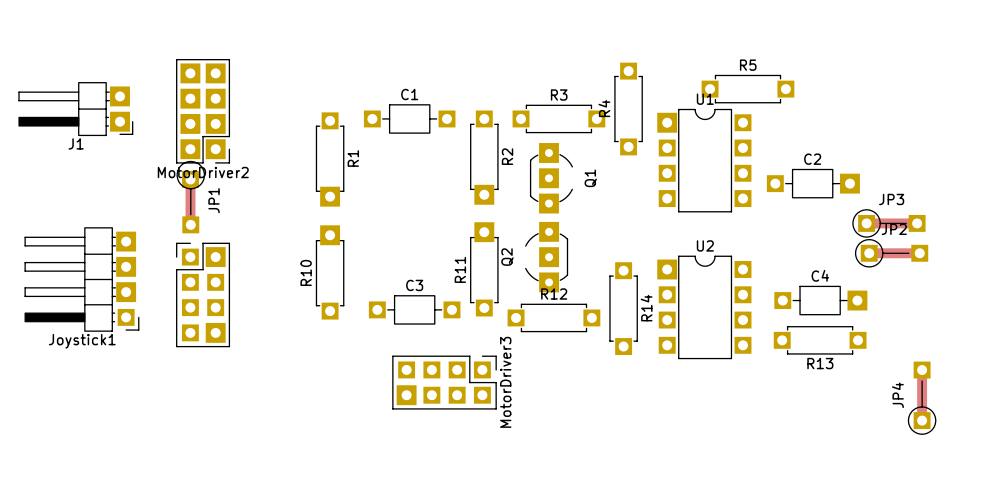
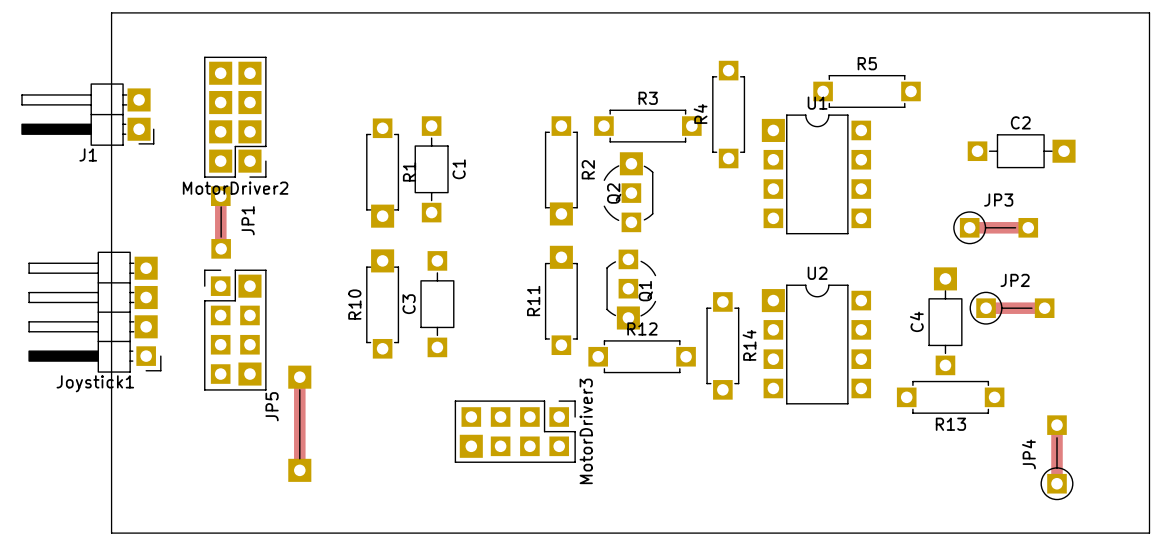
board edge: none -> (111, 12) (1149, 12) (1149, 533) (111, 533) (111, 12)
C1 rotation: 0° (409, 118) -> 90° clockwise (431, 169)
Q1 footprint: [529, 143, 573, 214] -> [606, 249, 657, 330]
JP1 footprint: [176, 160, 206, 234] -> [210, 186, 231, 259]
Q1 name position: Q1 (590, 178) -> Q1 (645, 291)
C2 position: (813, 183) -> (1021, 151)
Q2 footprint: [525, 221, 569, 293] -> [603, 152, 654, 233]
track: (866, 223) (917, 223) -> (969, 227) (1028, 227)
JP3 position: (888, 223) -> (995, 227)
track: (869, 253) (919, 253) -> (986, 308) (1044, 308)
JP2 position: (891, 253) -> (1012, 308)
Q2 name position: Q2 (507, 257) -> Q2 (614, 193)
C3 name position: C3 (414, 285) -> C3 (409, 304)
C4 rotation: 0° (820, 300) -> 90° counterclockwise (945, 321)
C3 rotation: 0° (414, 309) -> 90° clockwise (437, 304)
track: none -> (299, 377) (299, 470)
R13 position: (820, 340) -> (950, 397)
track: (922, 370) (922, 420) -> (1056, 425) (1056, 483)
JP5: none -> (299, 423)
JP4 position: (922, 398) -> (1056, 457)

